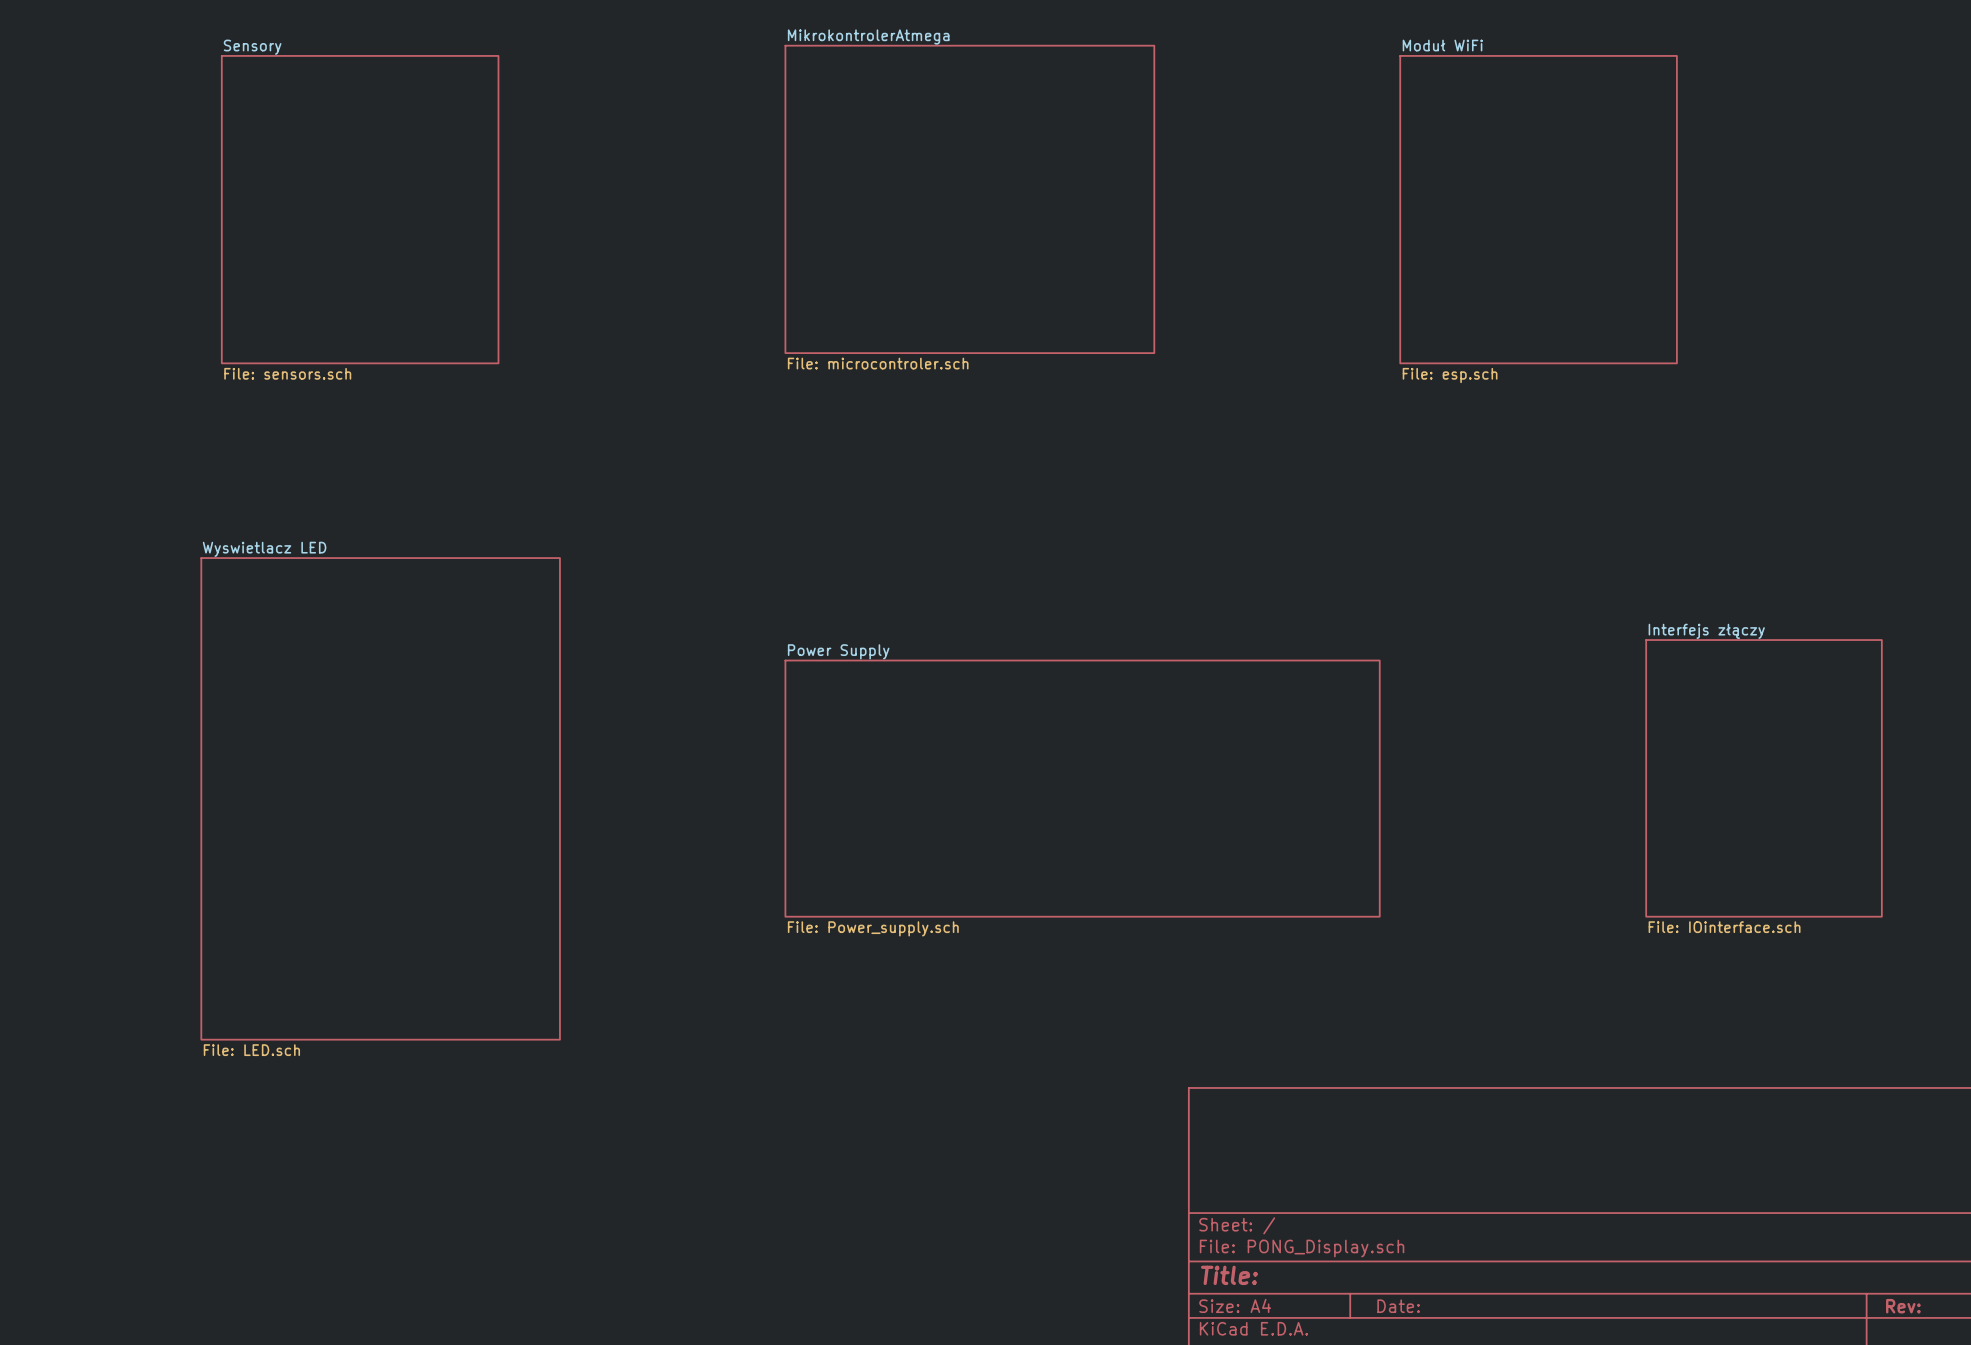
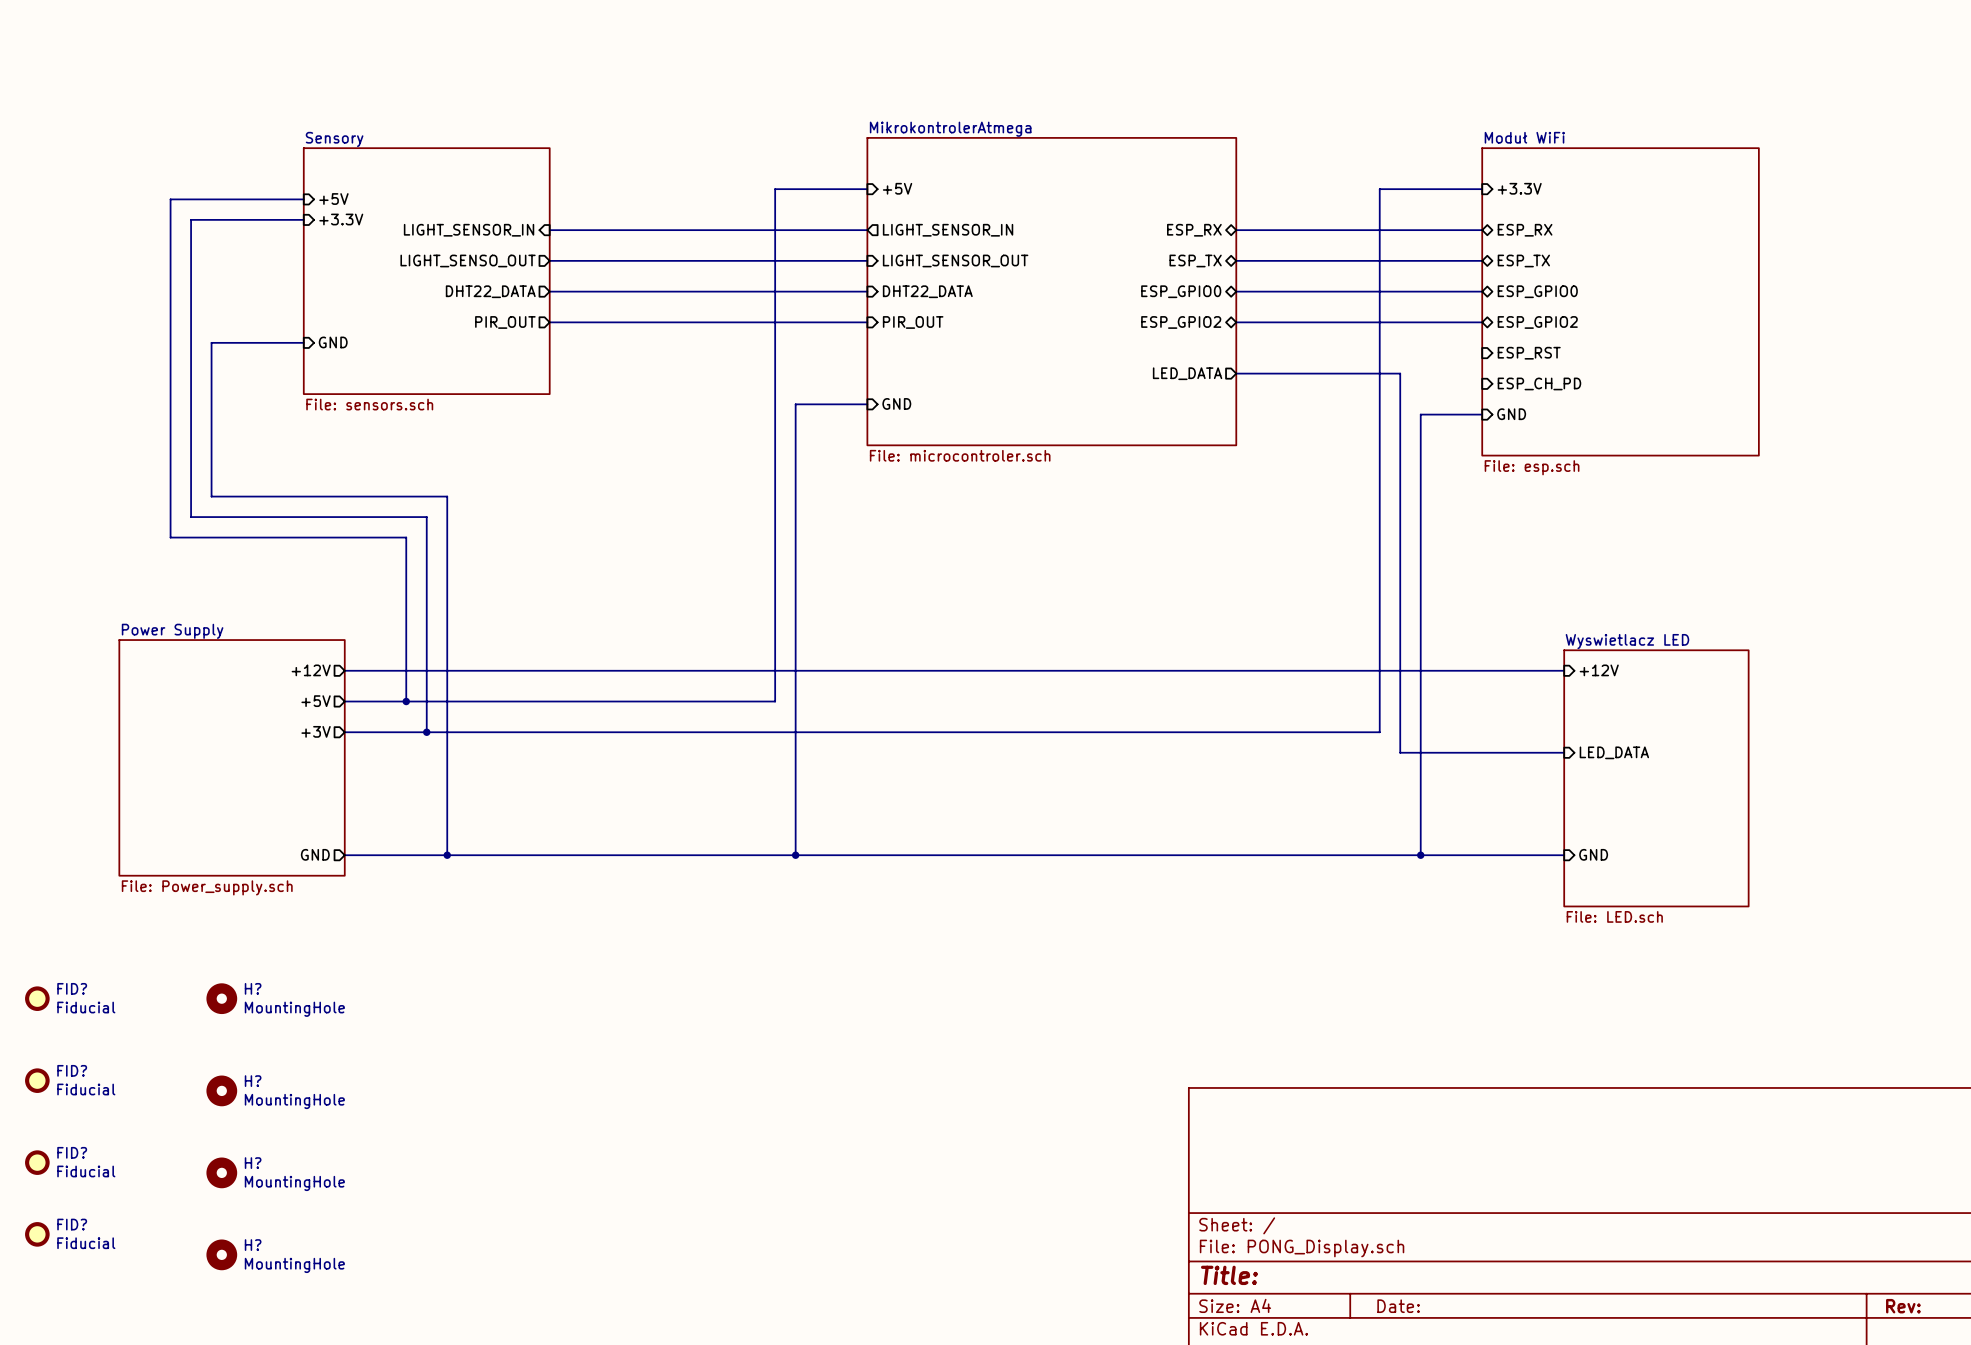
sheet pin: none -> +5V (897, 188)
sheet pin: none -> +3.3V (1519, 188)
wire: none -> (867, 189) (775, 189) (775, 701) (344, 701)
wire: none -> (1482, 189) (1379, 189) (1379, 732) (344, 732)
wire: none -> (303, 199) (170, 199) (170, 537) (406, 537) (406, 701)
sheet pin: none -> +5V (333, 199)
sheet MikrokontrolerAtmega position: (969, 199) -> (1051, 291)
sheet Sensory: File: sensors.sch (360, 209) -> none
sheet Moduł WiFi position: (1538, 209) -> (1620, 301)
wire: none -> (303, 219) (191, 219) (191, 517) (426, 517) (426, 732)
sheet pin: none -> +3.3V (341, 219)
sheet pin: none -> LIGHT_SENSOR_IN (469, 230)
wire: none -> (549, 230) (867, 230)
sheet pin: none -> LIGHT_SENSOR_IN (948, 230)
sheet pin: none -> ESP_RX (1194, 230)
wire: none -> (1236, 230) (1482, 230)
sheet pin: none -> ESP_RX (1525, 230)
sheet pin: none -> LIGHT_SENSO_OUT (468, 260)
wire: none -> (549, 260) (867, 260)
sheet pin: none -> LIGHT_SENSOR_OUT (955, 260)
sheet pin: none -> ESP_TX (1195, 260)
wire: none -> (1236, 260) (1482, 260)
sheet pin: none -> ESP_TX (1523, 260)
sheet Sensory: none -> File: sensors.sch (426, 271)
sheet pin: none -> DHT22_DATA (490, 291)
wire: none -> (549, 291) (867, 291)
sheet pin: none -> DHT22_DATA (927, 291)
sheet pin: none -> ESP_GPIO0 (1181, 291)
wire: none -> (1236, 291) (1482, 291)
sheet pin: none -> ESP_GPIO0 (1537, 291)
sheet pin: none -> PIR_OUT (505, 322)
wire: none -> (549, 322) (867, 322)
sheet pin: none -> PIR_OUT (913, 322)
sheet pin: none -> ESP_GPIO2 (1181, 322)
wire: none -> (1236, 322) (1482, 322)
sheet pin: none -> ESP_GPIO2 (1537, 322)
wire: none -> (303, 342) (211, 342) (211, 496) (447, 496) (447, 855)
sheet pin: none -> GND (333, 342)
sheet pin: none -> ESP_RST (1529, 353)
sheet pin: none -> LED_DATA (1187, 373)
wire: none -> (1236, 373) (1400, 373) (1400, 752) (1564, 752)
sheet pin: none -> ESP_CH_PD (1539, 383)
sheet pin: none -> GND (896, 403)
wire: none -> (867, 404) (795, 404) (795, 855)
wire: none -> (1482, 414) (1420, 414) (1420, 855)
sheet pin: none -> GND (1511, 414)
sheet pin: none -> +12V (311, 670)
wire: none -> (344, 670) (1564, 670)
sheet pin: none -> +12V (1599, 670)
sheet pin: none -> +5V (316, 701)
junction: none -> (406, 701)
sheet pin: none -> +3V (316, 731)
junction: none -> (426, 732)
sheet pin: none -> LED_DATA (1614, 752)
sheet Power Supply: none -> File: Power_supply.sch (232, 757)
sheet Wyswietlacz LED: none -> File: LED.sch (1656, 778)
sheet Interfejs złączy: File: IOinterface.sch (1764, 778) -> none
sheet Power Supply: File: Power_supply.sch (1082, 788) -> none
sheet Wyswietlacz LED: File: LED.sch (380, 798) -> none
sheet pin: none -> GND (315, 854)
sheet pin: none -> GND (1593, 854)
wire: none -> (344, 855) (1564, 855)
junction: none -> (447, 855)
junction: none -> (795, 855)
junction: none -> (1420, 855)
FID?: none -> Fiducial (37, 998)
H?: none -> MountingHole (221, 998)
FID?: none -> Fiducial (37, 1080)
H?: none -> MountingHole (221, 1090)
FID?: none -> Fiducial (37, 1162)
H?: none -> MountingHole (221, 1172)
FID?: none -> Fiducial (37, 1234)
H?: none -> MountingHole (221, 1254)

